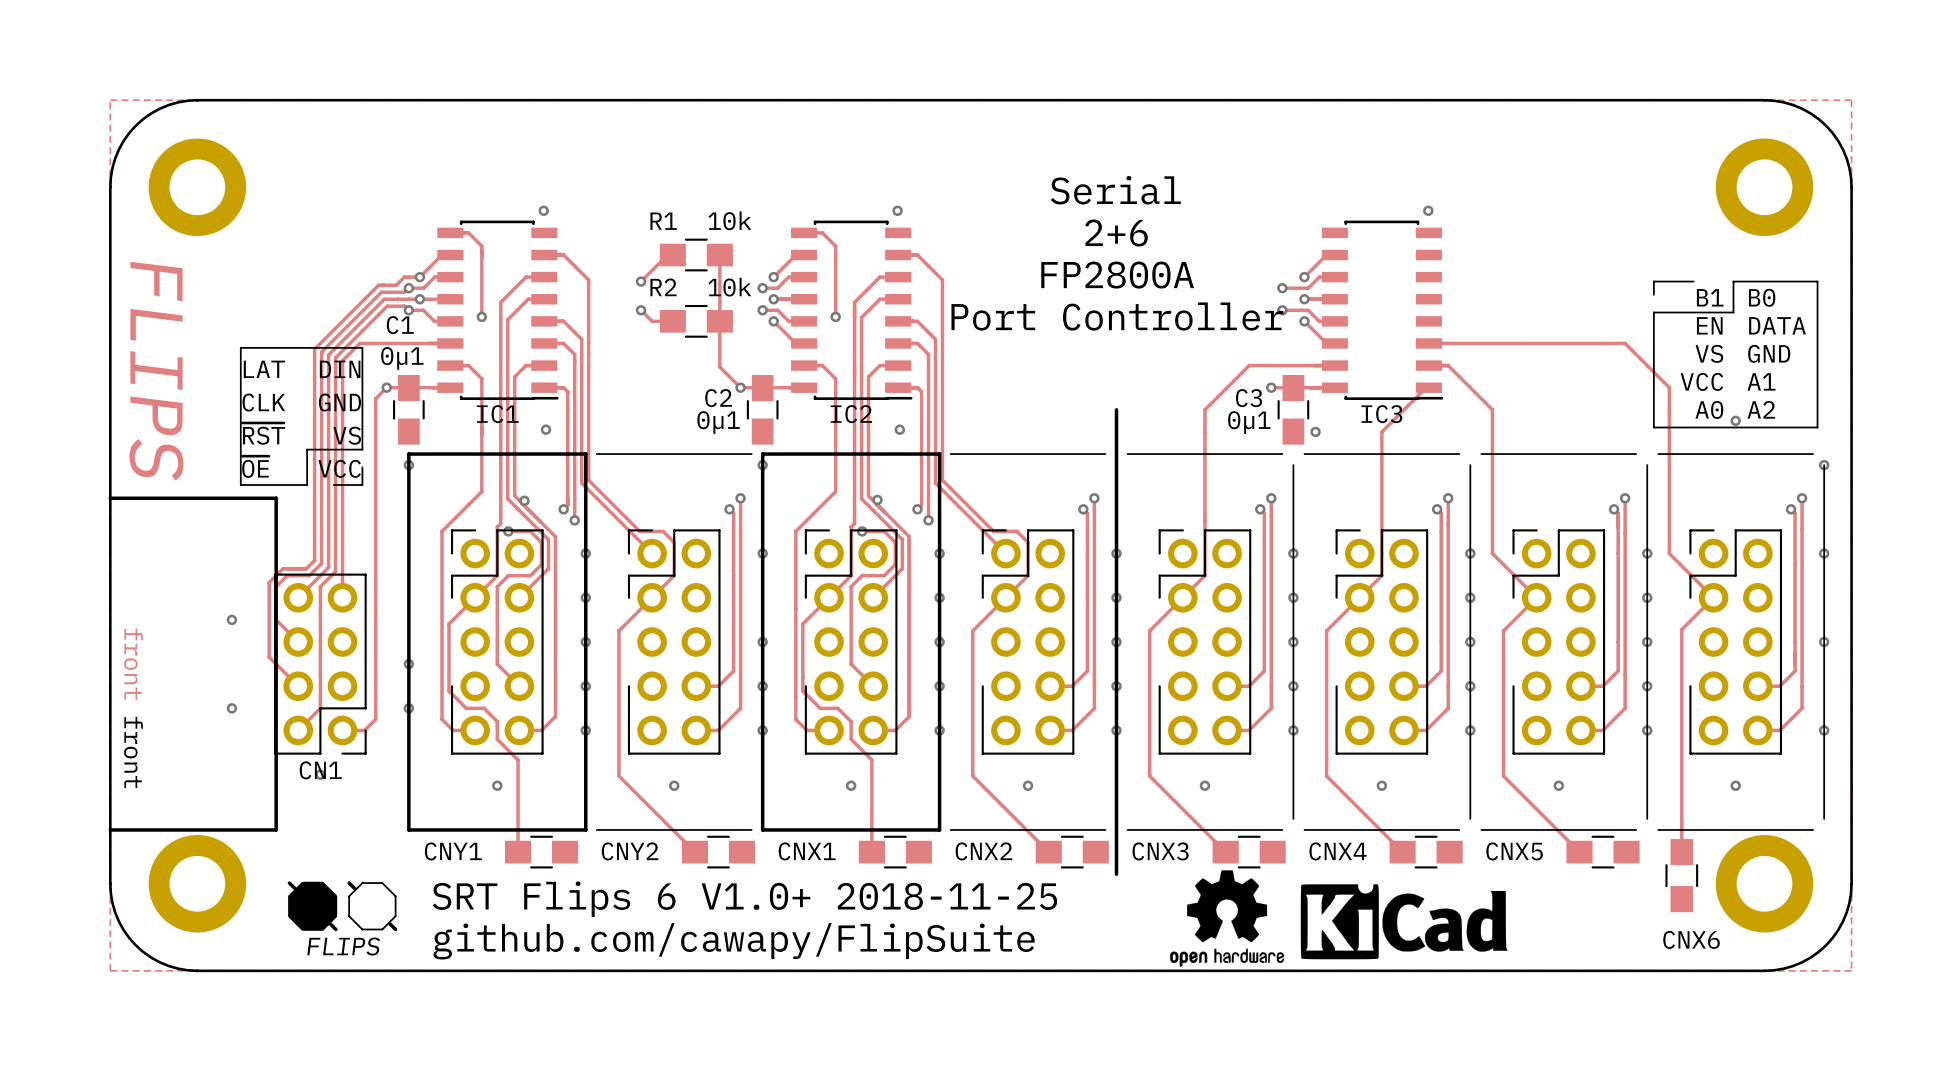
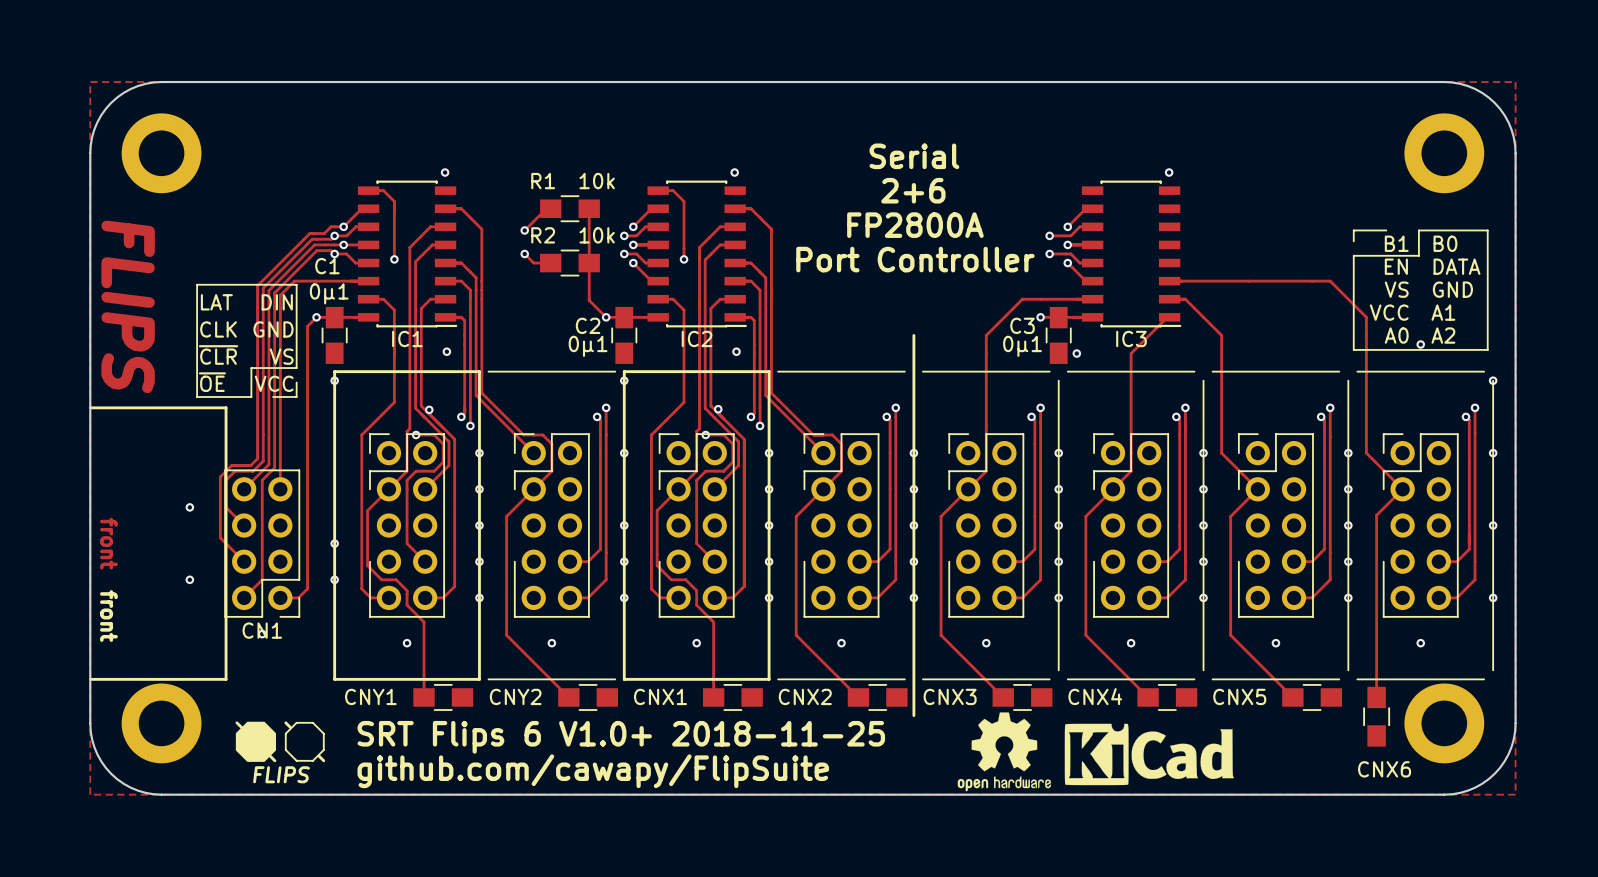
text: ~{RST} (263, 433) -> ~{CLR} (218, 354)

